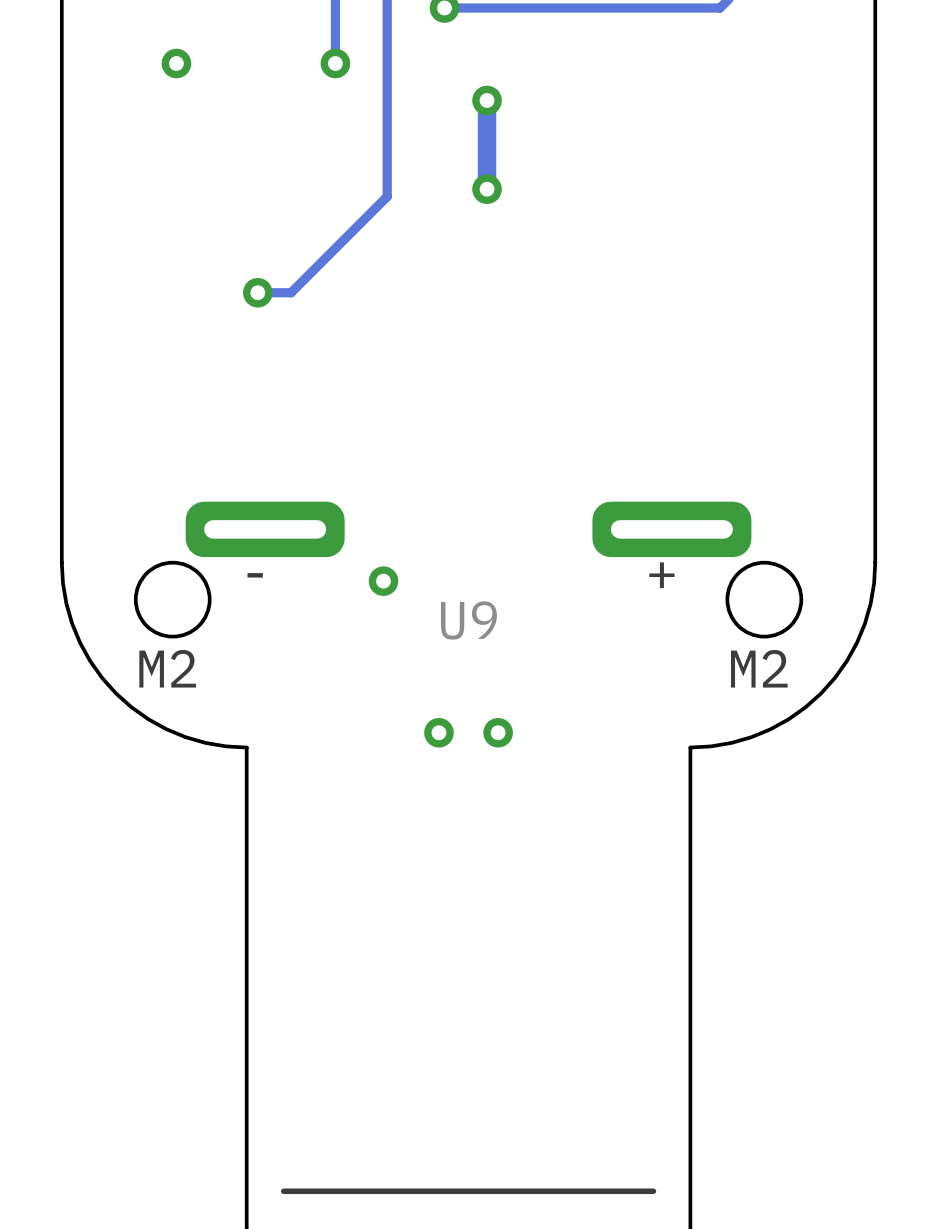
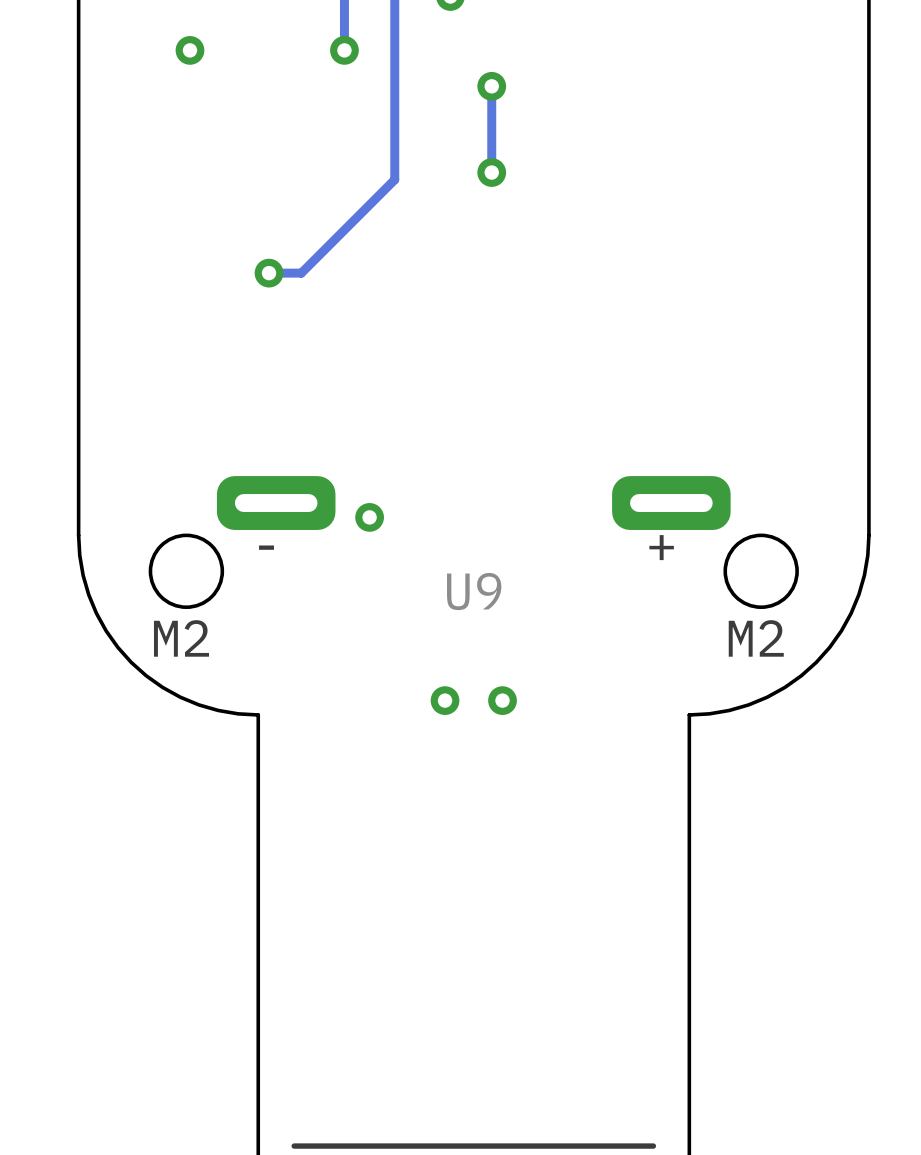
track width: thick (487, 100) (487, 189) -> thin (491, 86) (491, 172)
U9 footprint: [185, 501, 752, 558] -> [216, 476, 731, 530]
via position: (383, 581) -> (369, 517)

